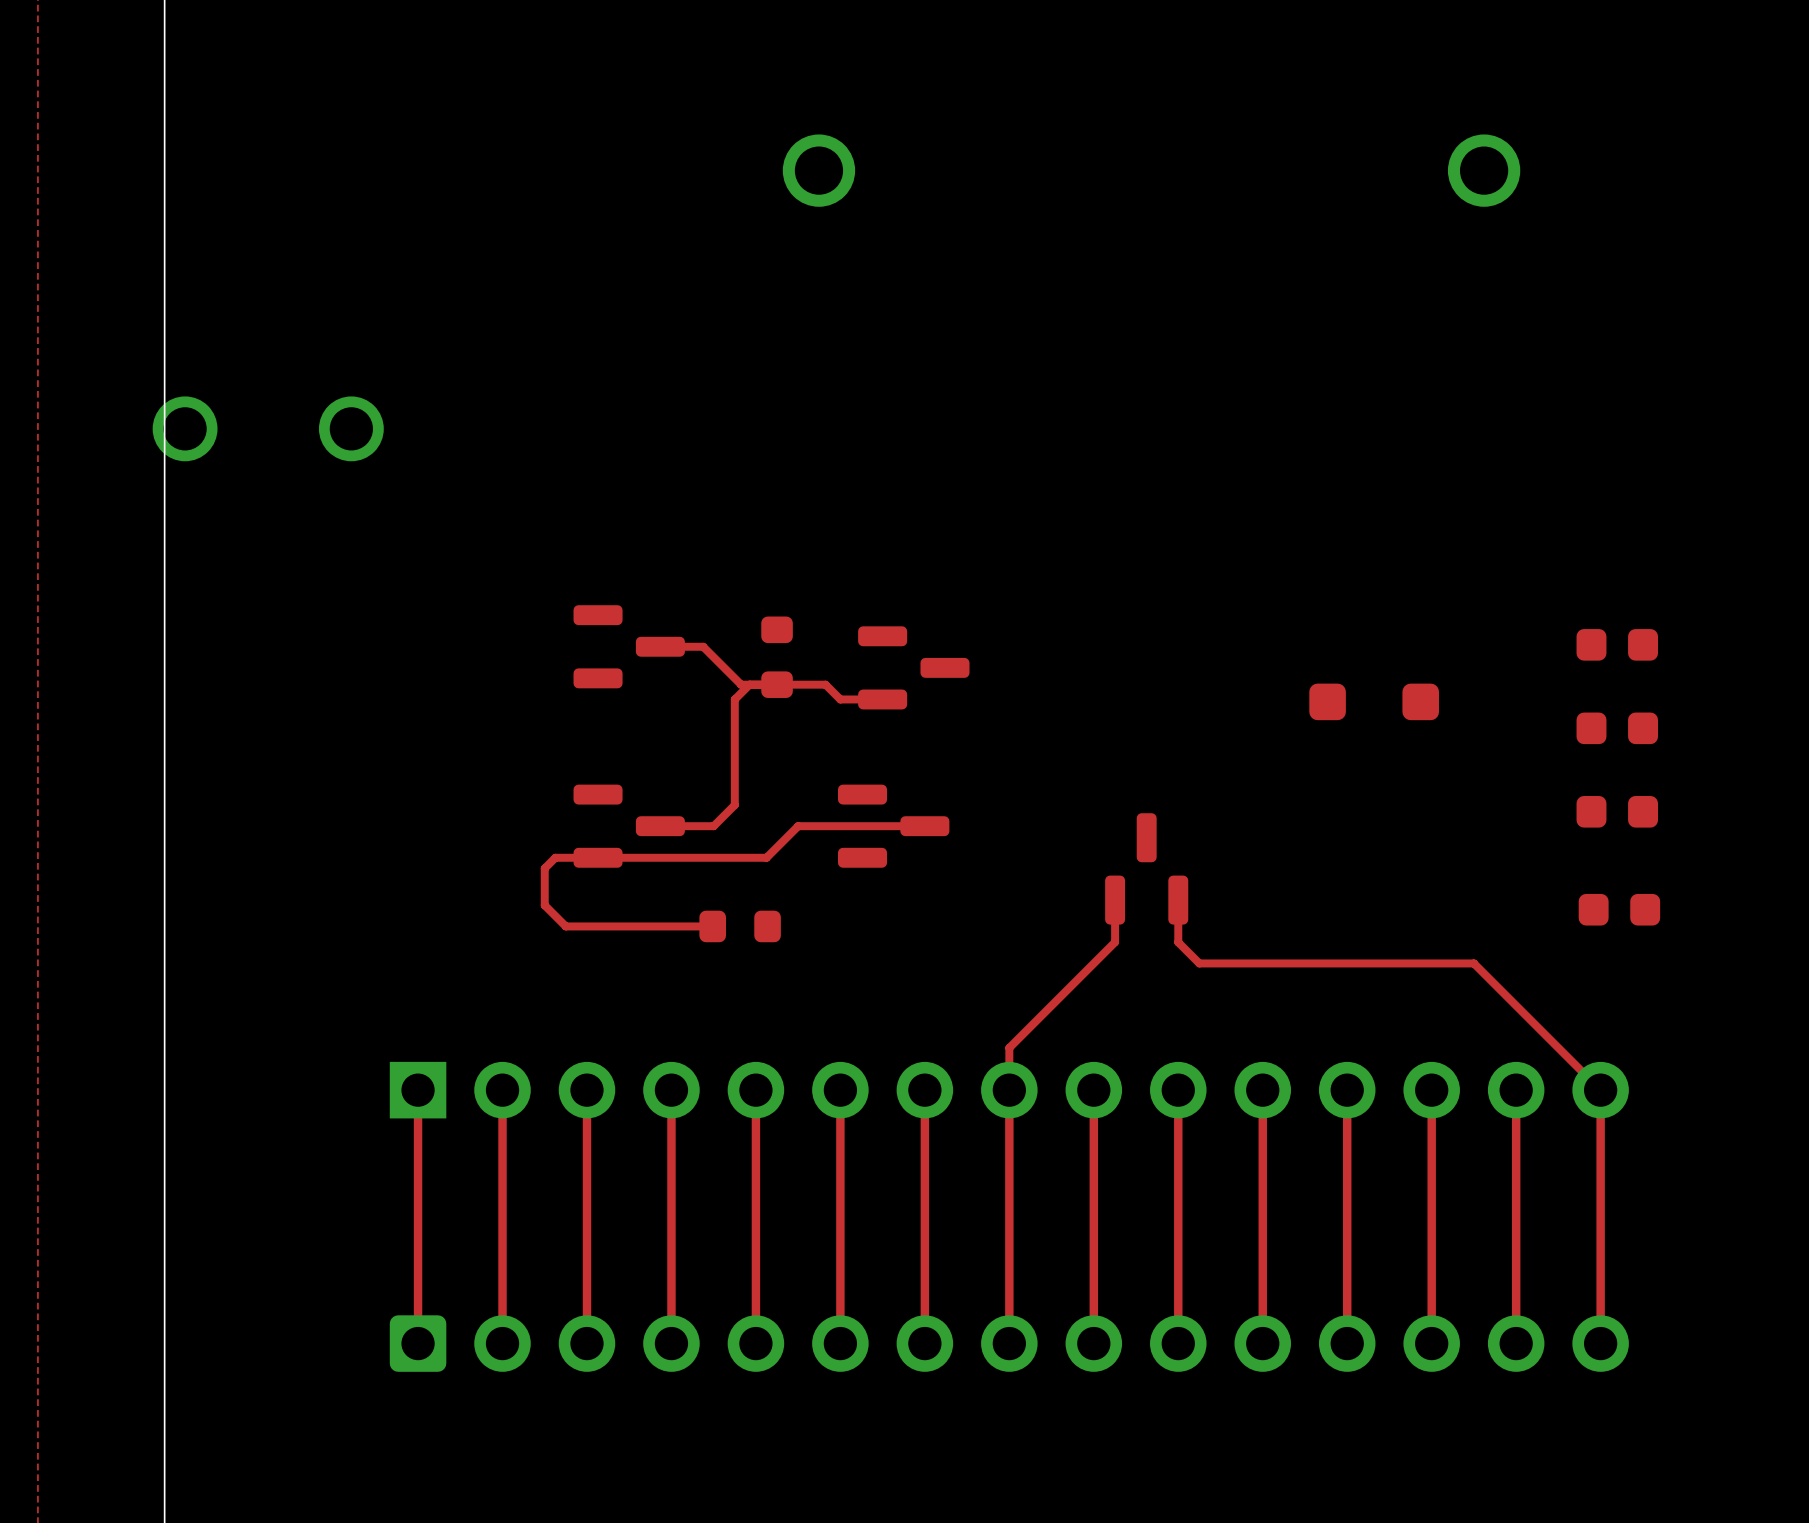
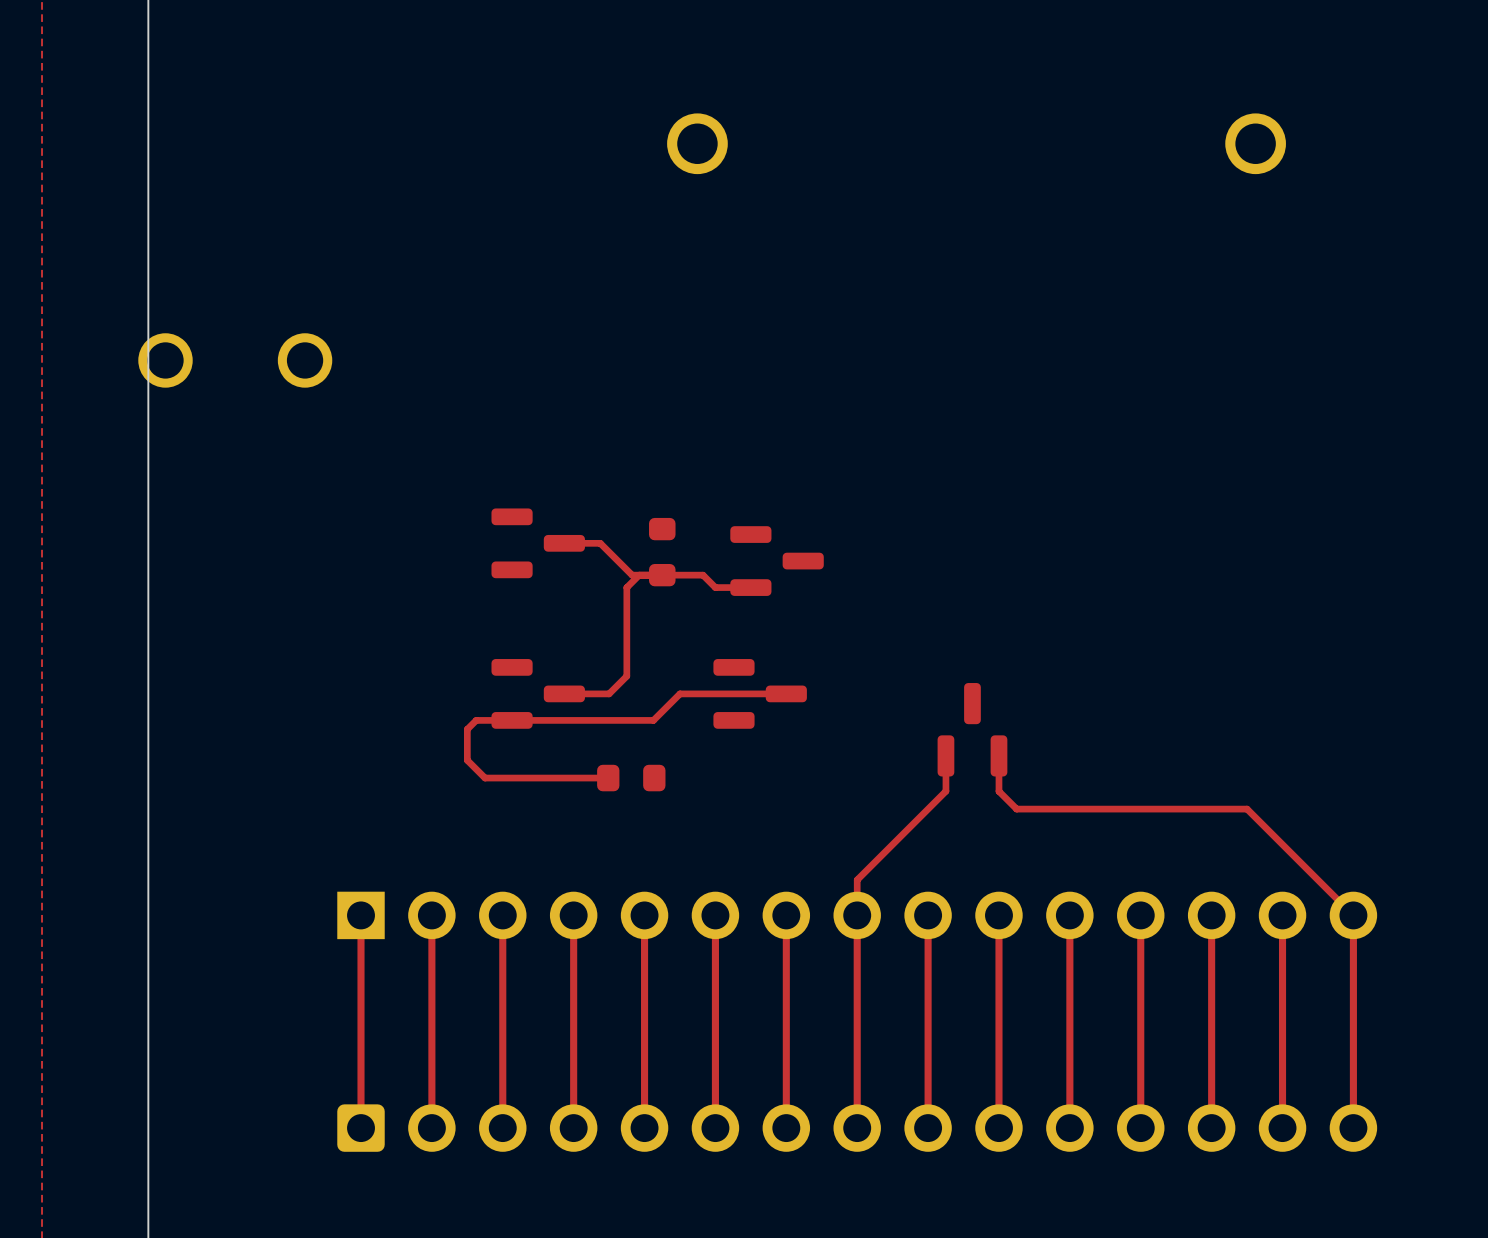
part: (1617, 644) -> none
part: (1374, 701) -> none
part: (1617, 728) -> none
part: (1617, 811) -> none
part: (1619, 909) -> none

